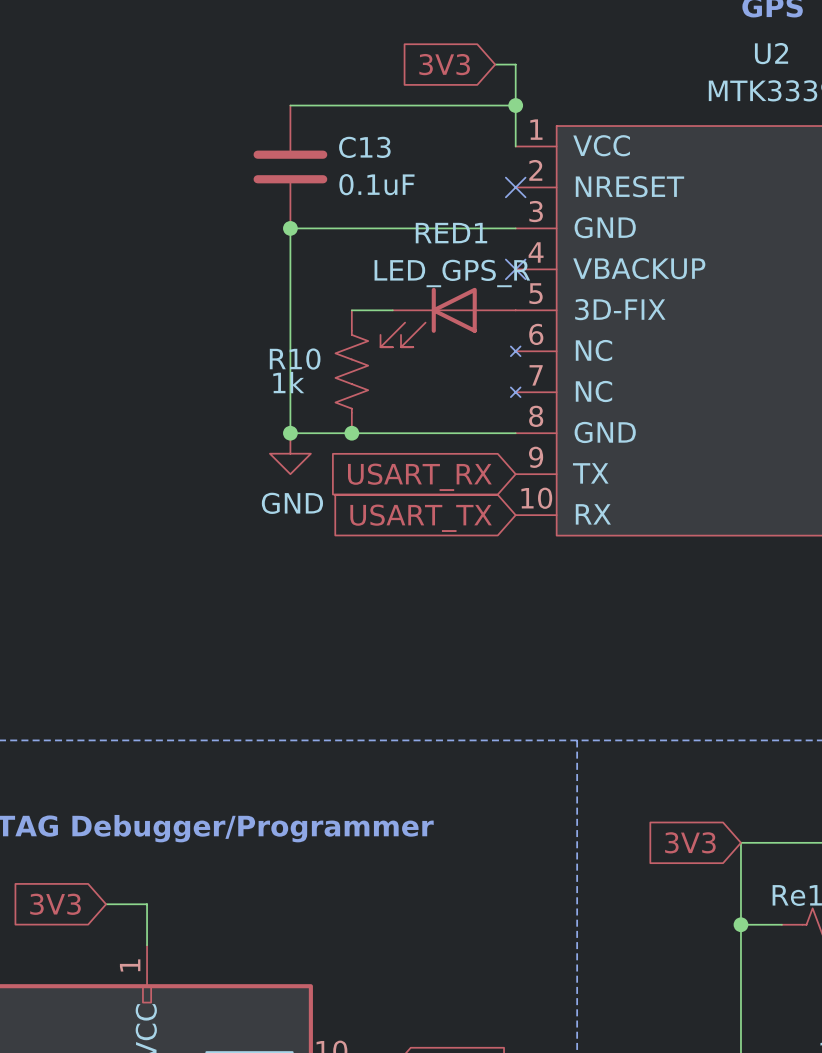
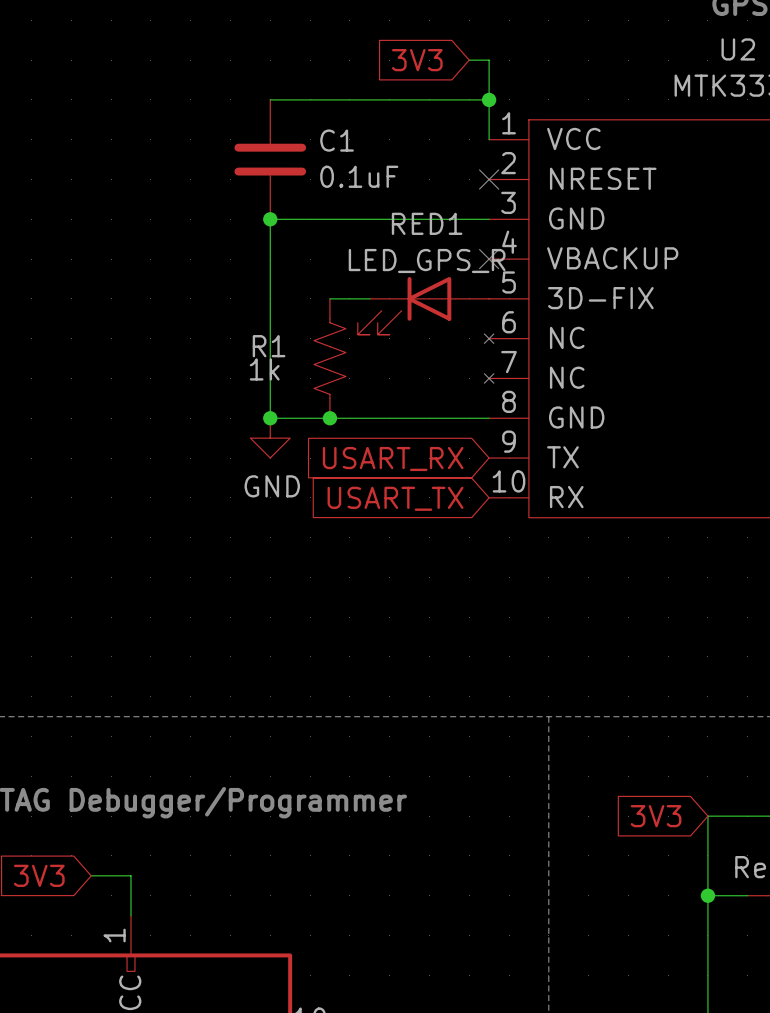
C13 name: C13 (364, 147) -> C1 (337, 140)
R10 name: R10 (295, 359) -> R1 (269, 346)

